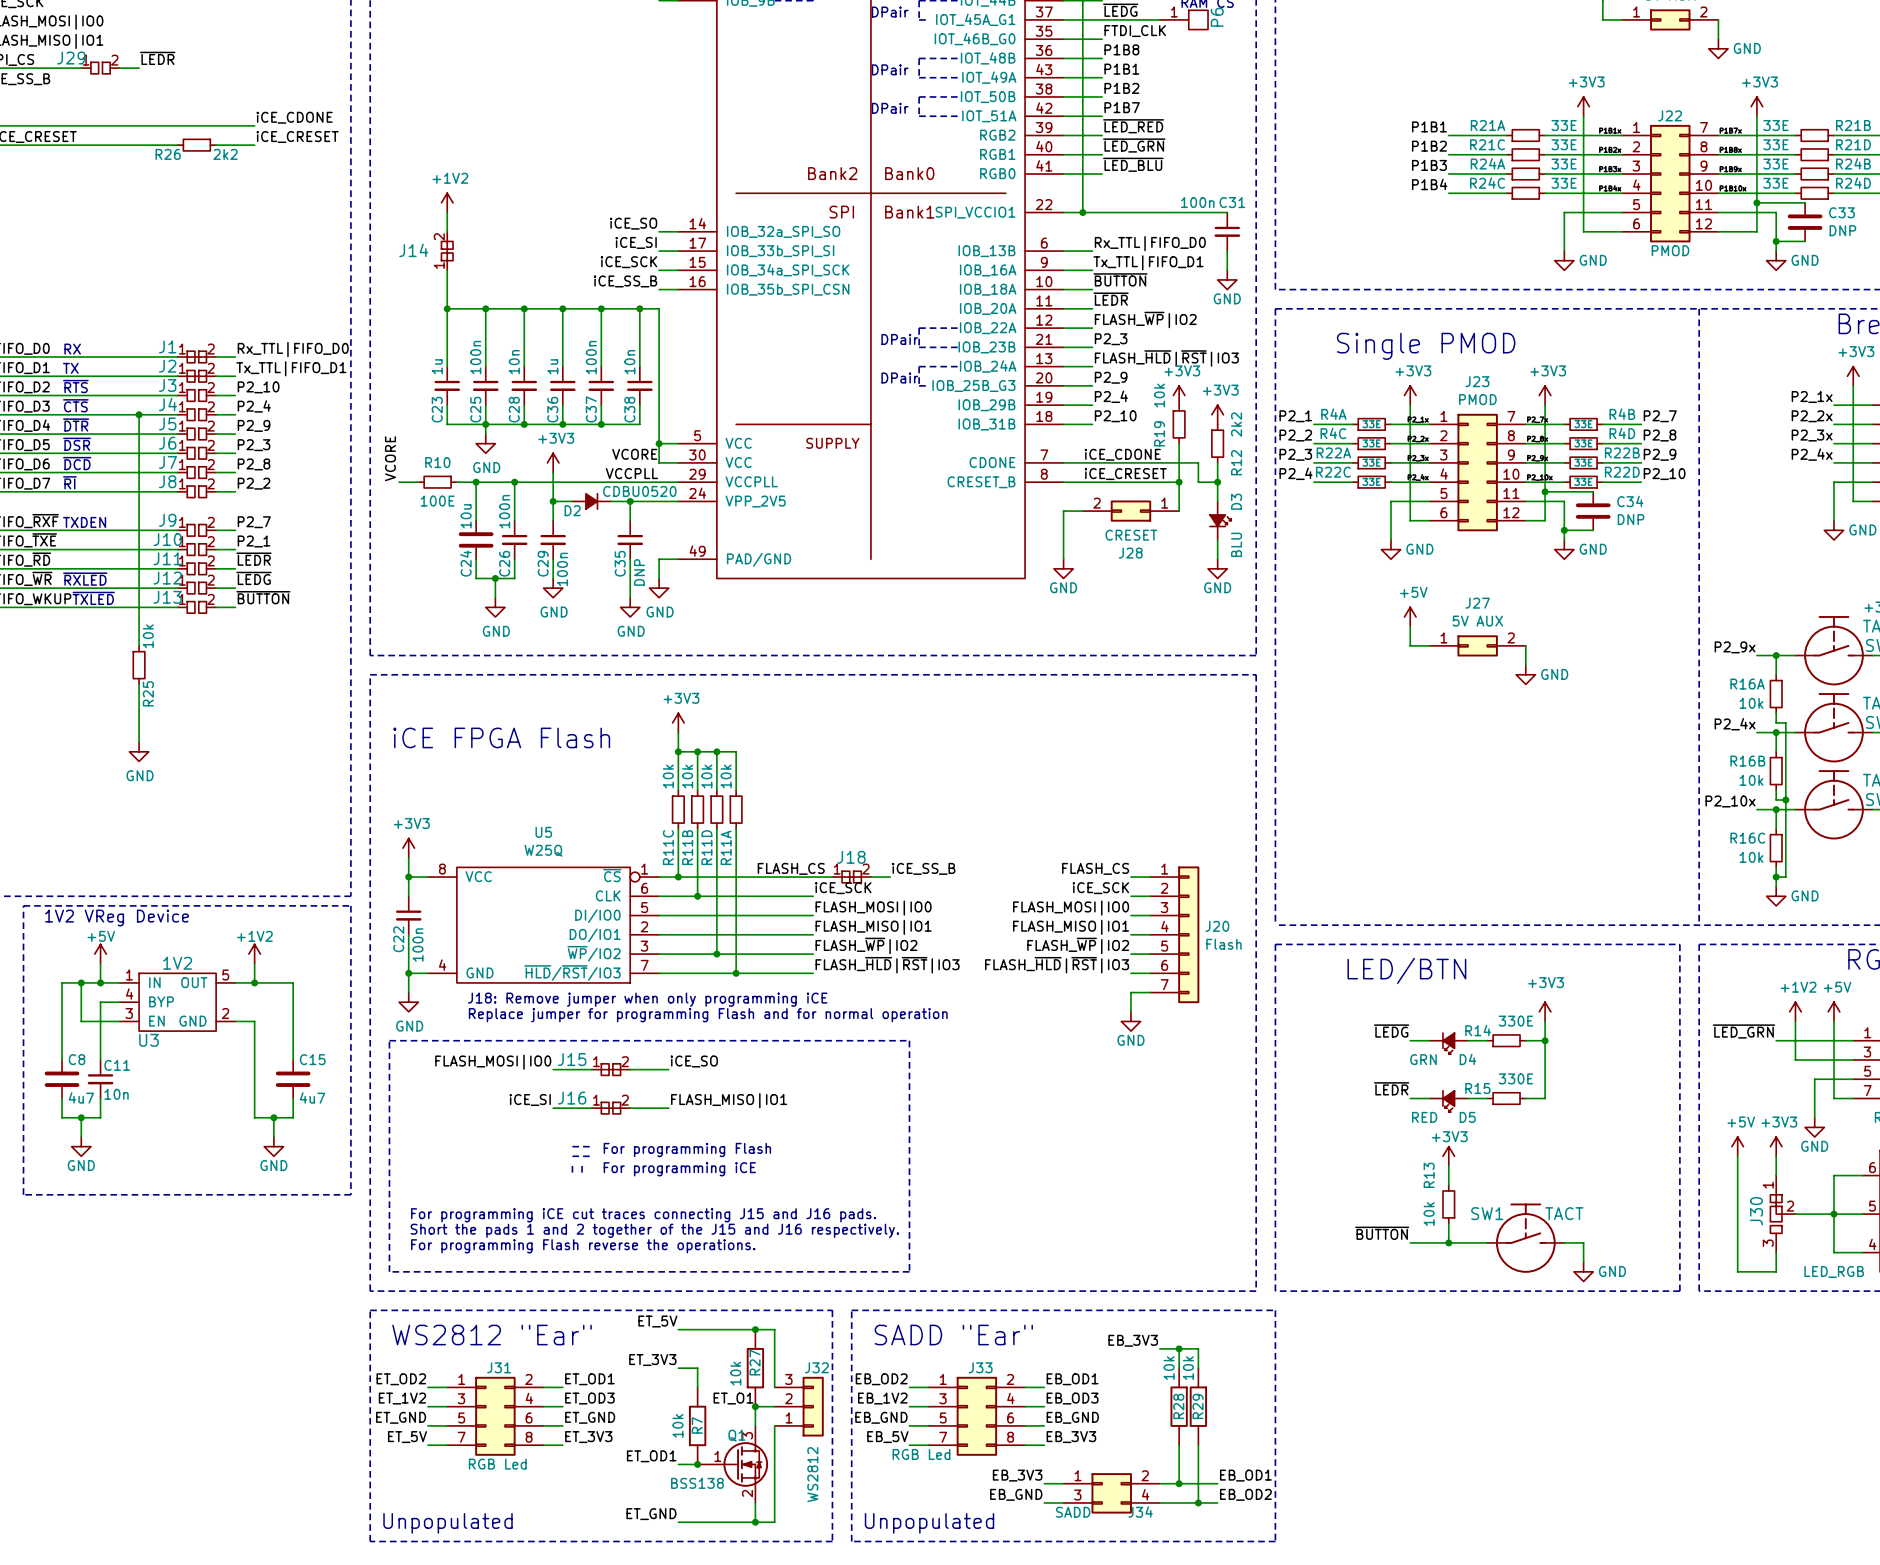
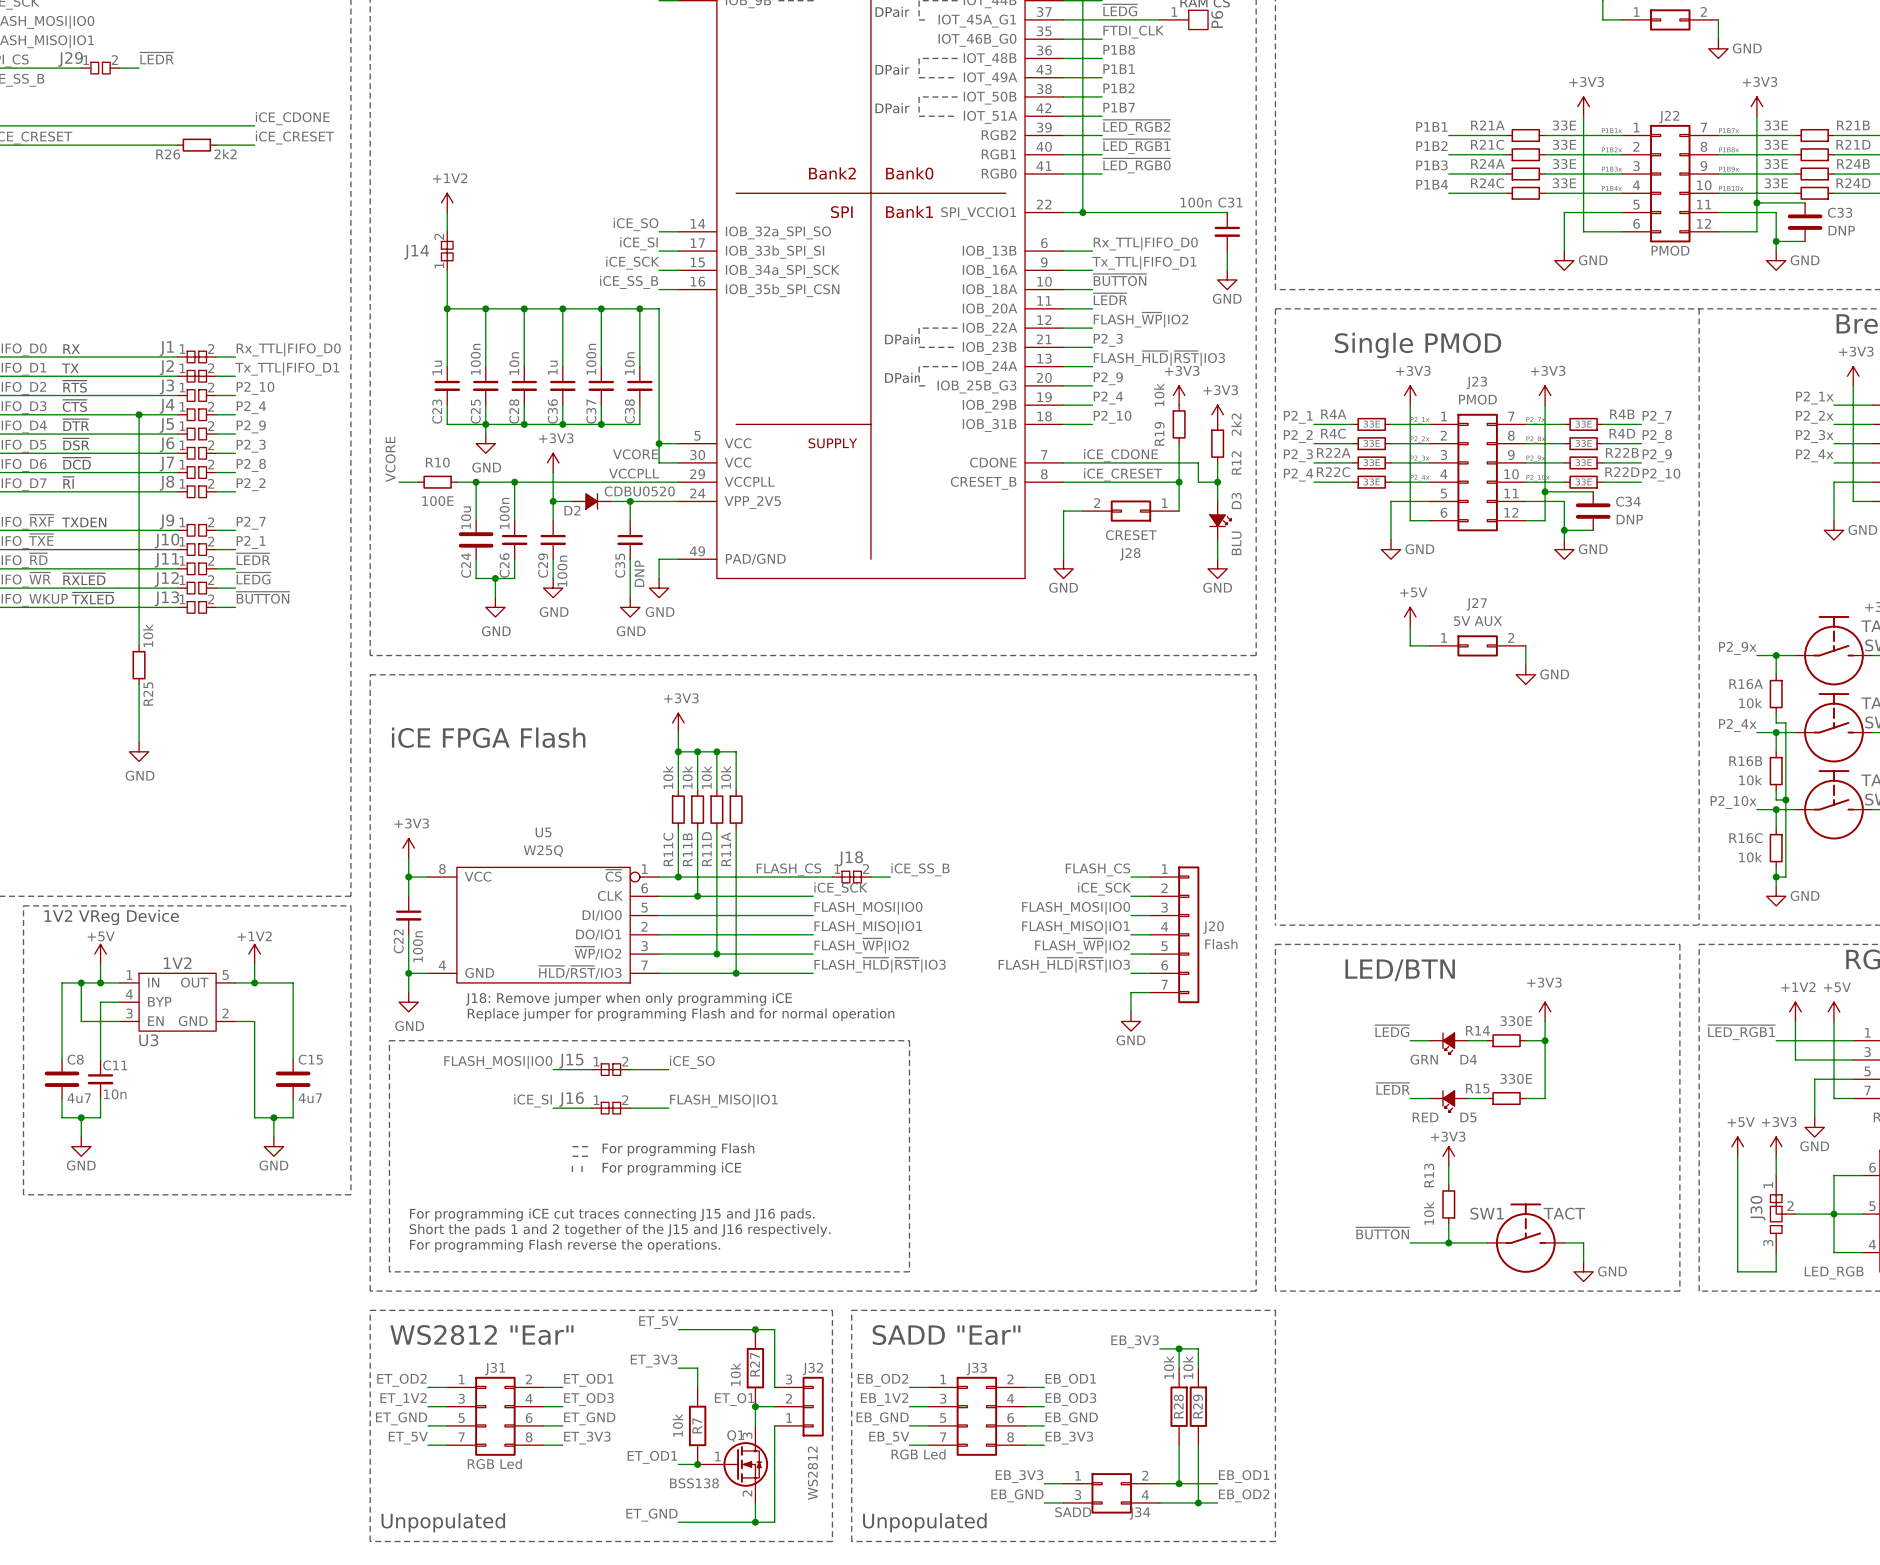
label: ~{LED_RED} (1133, 126) -> ~{LED_RGB2} (1136, 127)
label: ~{LED_GRN} (1134, 145) -> ~{LED_RGB1} (1136, 146)
label: ~{LED_BLU} (1133, 164) -> ~{LED_RGB0} (1136, 165)
label: ~{LED_GRN} (1744, 1031) -> ~{LED_RGB1} (1741, 1032)

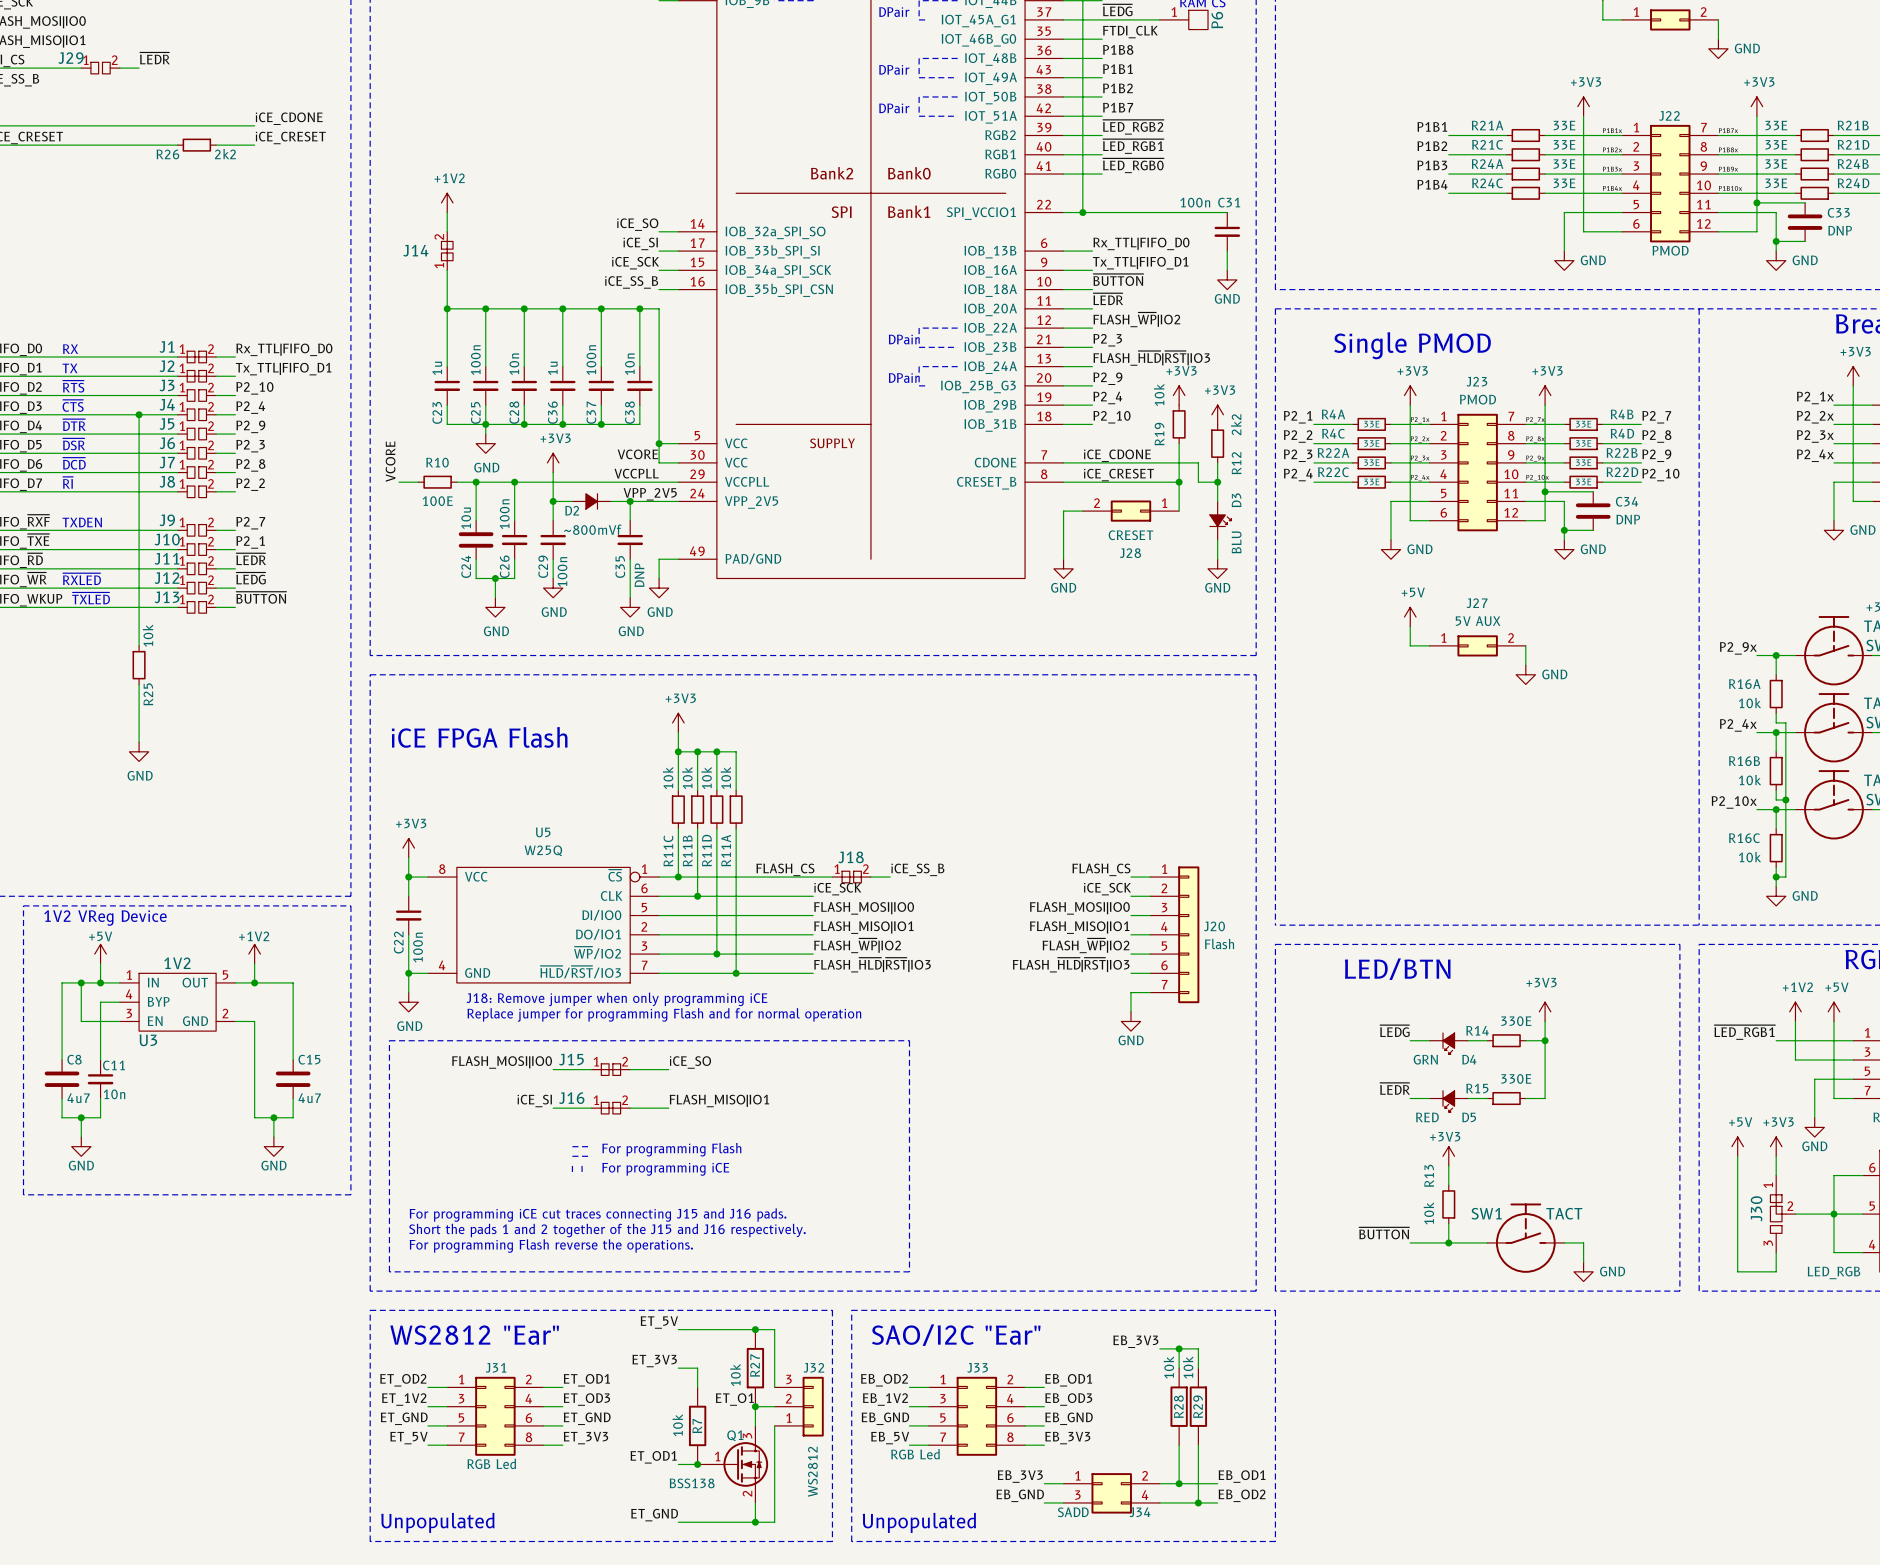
D2 value: CDBU0520 (639, 491) -> ~800mVf (592, 529)
label: none -> VPP_2V5 (650, 494)
text: SADD "Ear" (946, 1335) -> SAO/I2C "Ear" (956, 1335)

